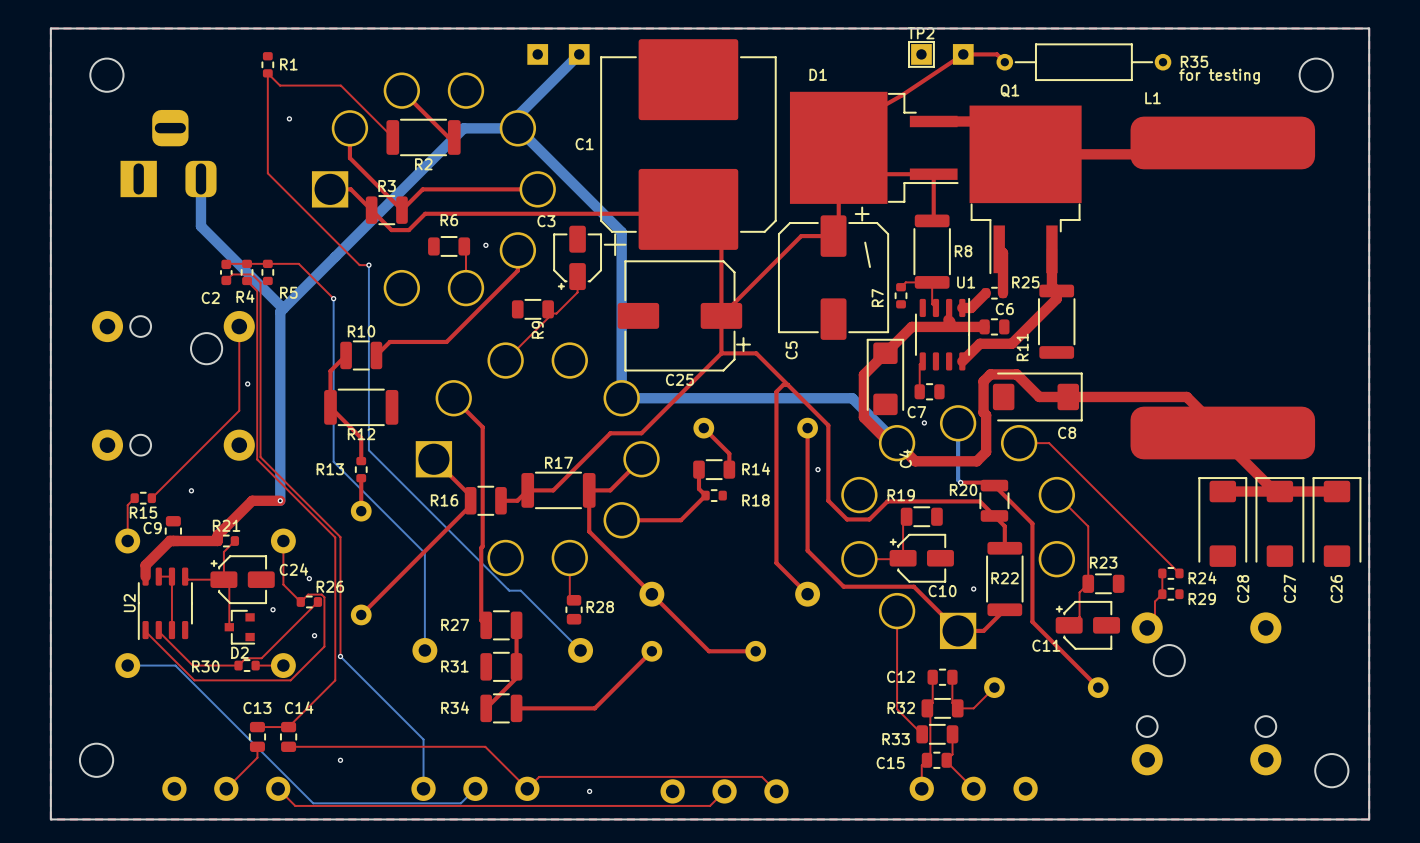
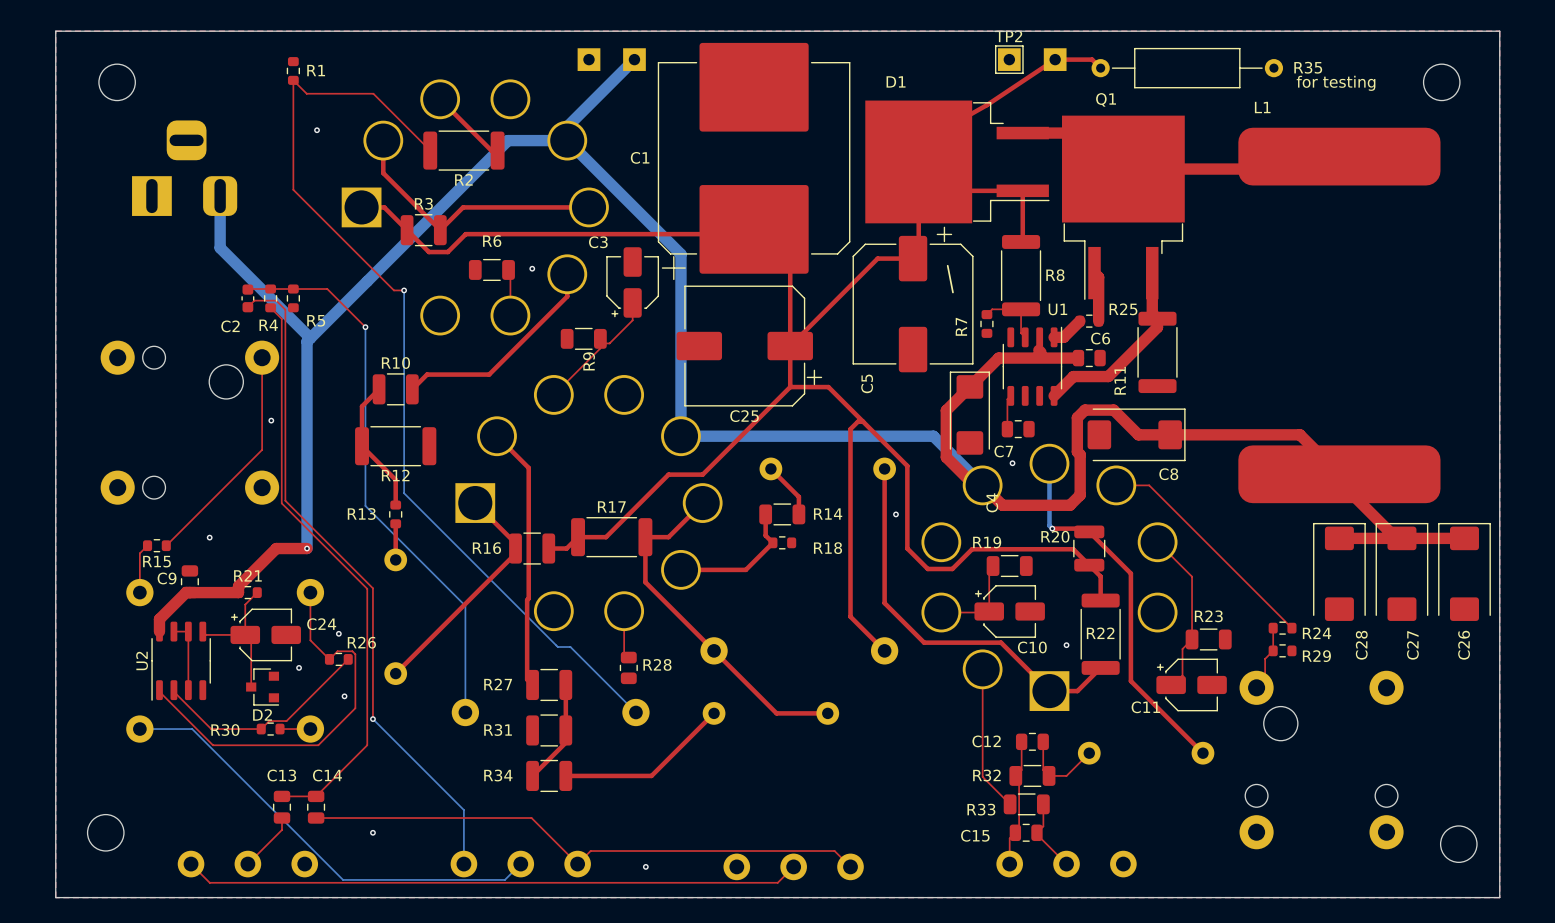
top track: (278, 788) (295, 805) -> (191, 864) (209, 882) (323, 882)

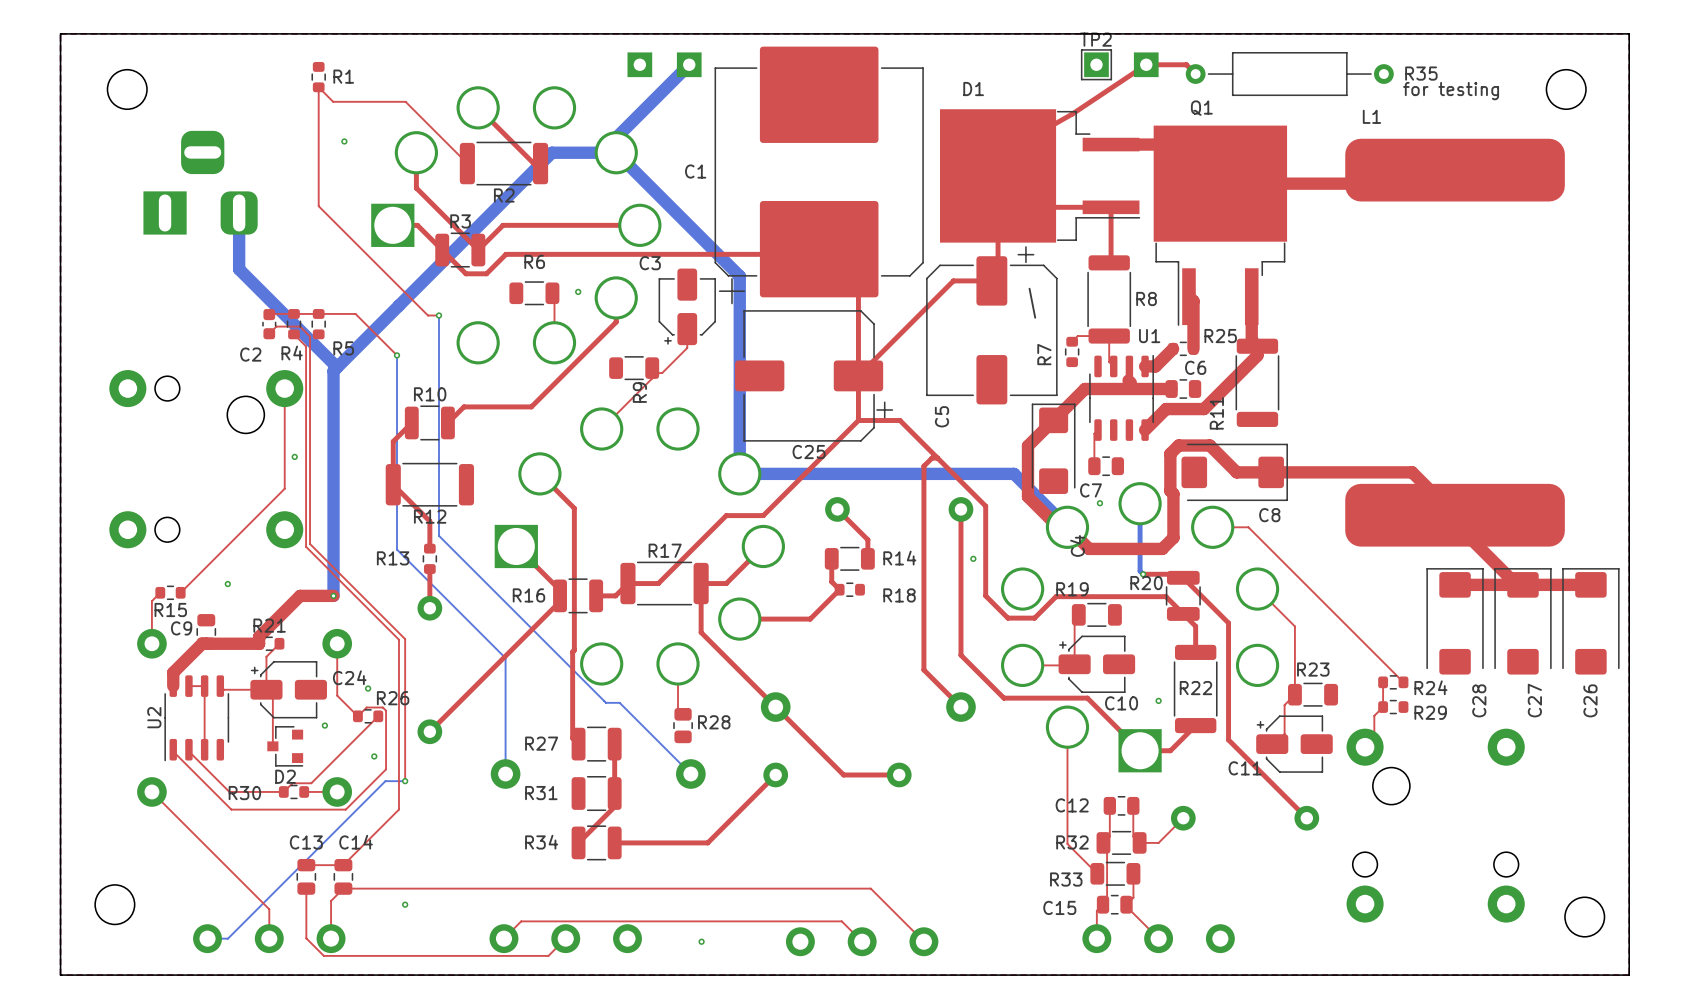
bottom track: (372, 719) (463, 810) (463, 864) -> (405, 781) (385, 781) (227, 938) (207, 938)
bottom track: (139, 729) (192, 729) (343, 879) (504, 879) (520, 864) -> none
top track: none -> (343, 888) (331, 900) (331, 938)
top track: (531, 818) (577, 864) (590, 851) (834, 851) -> (577, 888) (870, 888) (906, 924)
top track: (282, 829) (247, 864) -> (151, 791) (269, 909) (269, 938)
top track: none -> (306, 901) (306, 938) (323, 955) (548, 955) (565, 938)
top track: (191, 864) (209, 882) (777, 882) (793, 866) -> (503, 938) (521, 921) (841, 921) (862, 941)

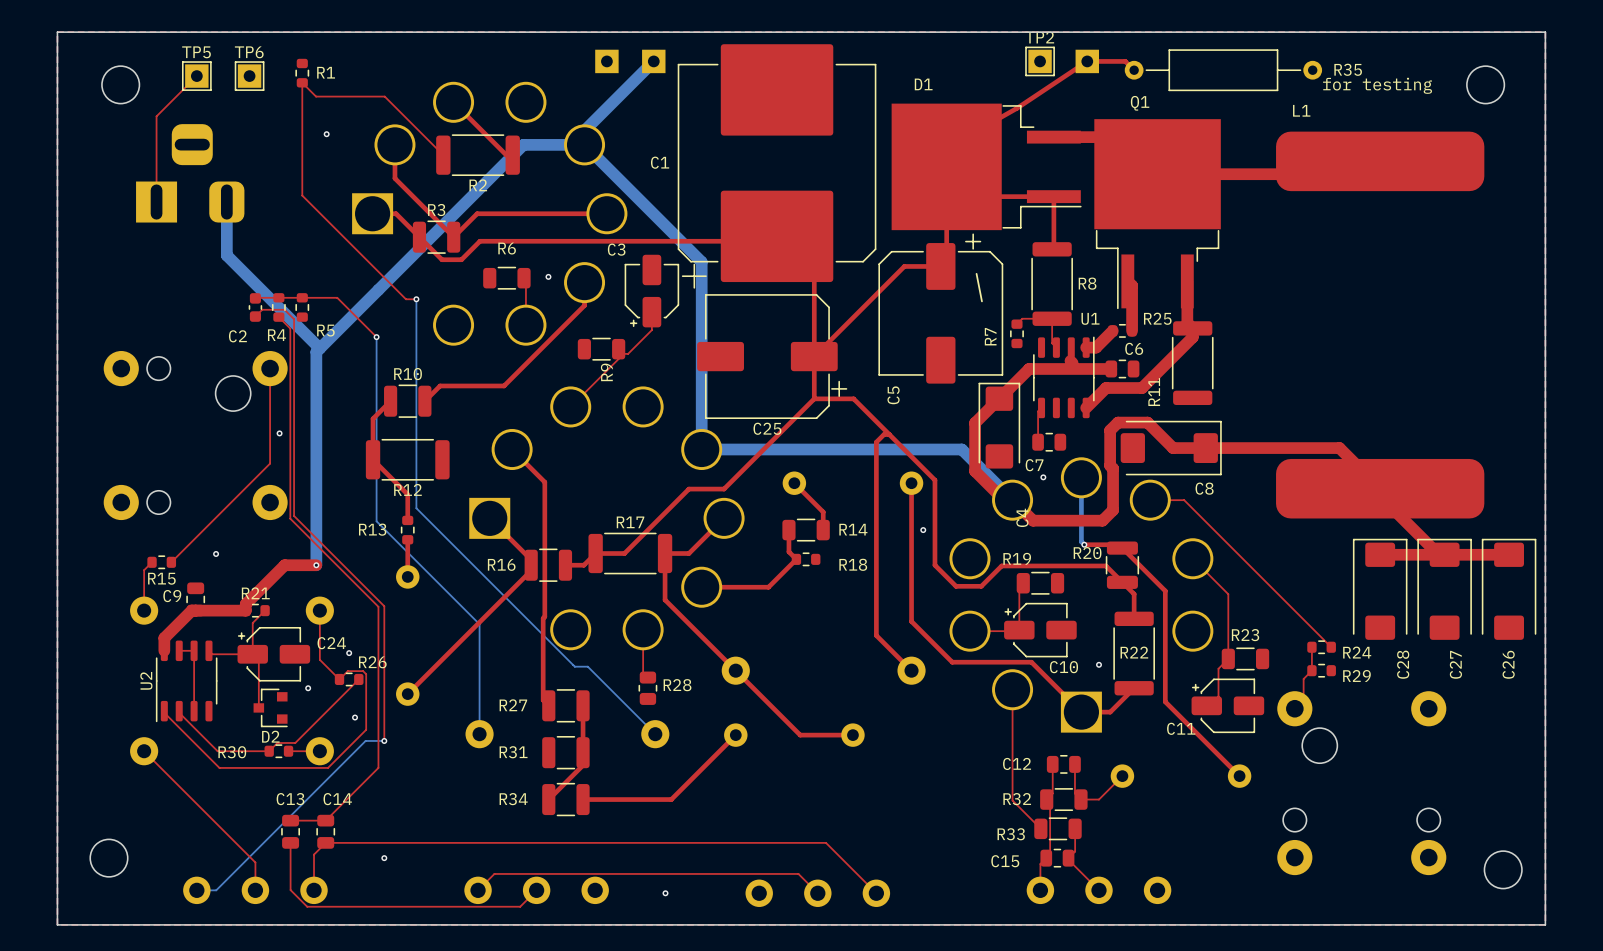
top track: none -> (196, 76) (156, 116) (156, 202)
TP5: none -> (196, 76)
TP6: none -> (249, 76)

